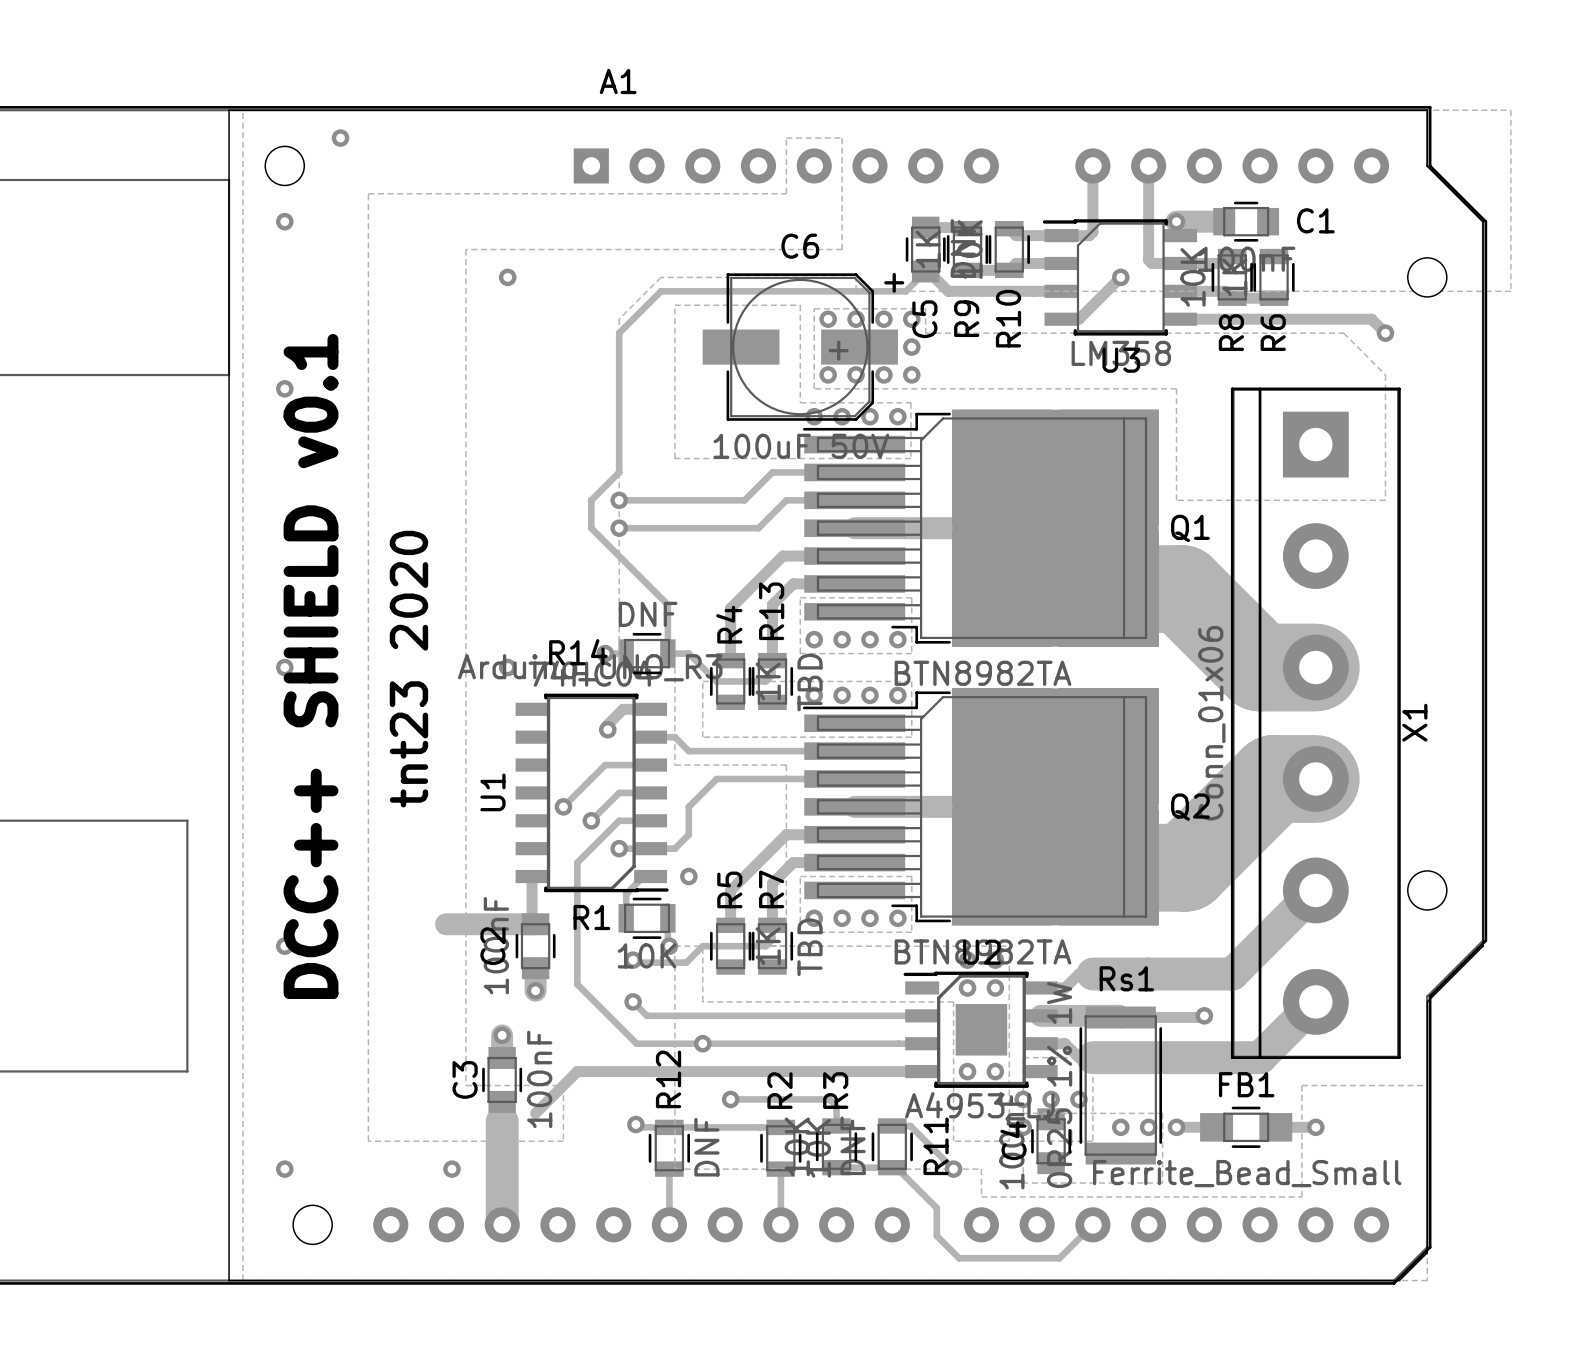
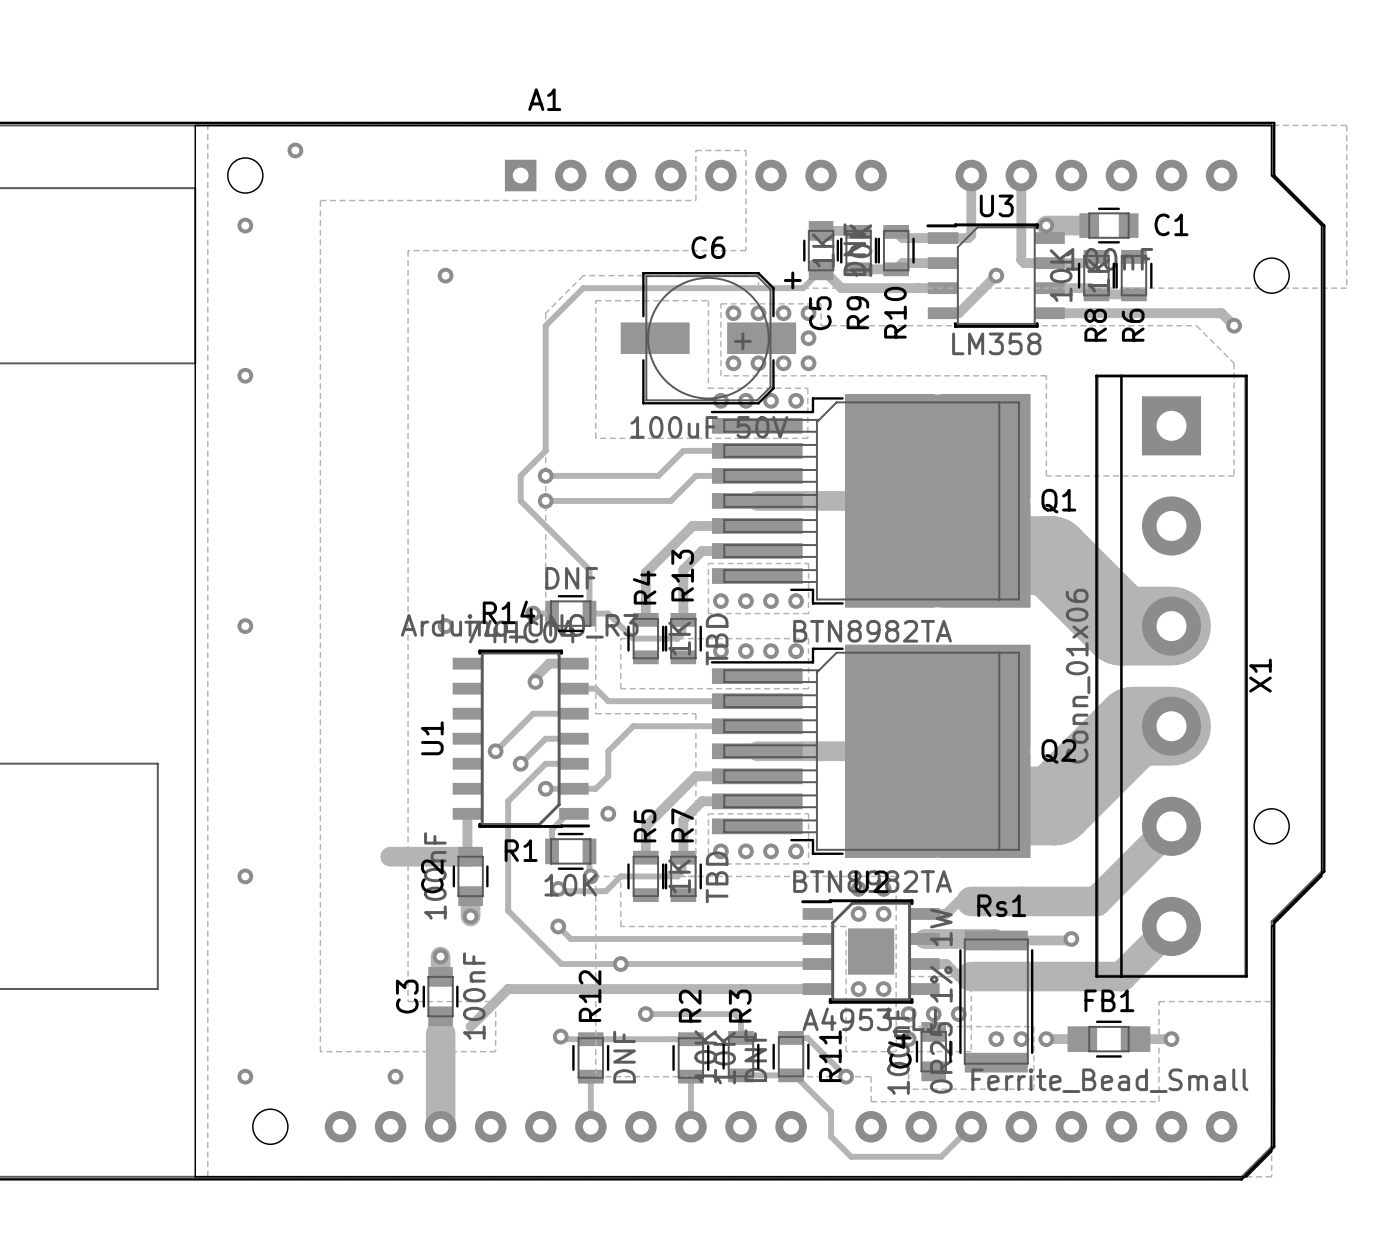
U3 name position: U3 (1121, 360) -> U3 (996, 205)
text: DCC++ SHIELD v0.1 (311, 666) -> none
text: tnt23 2020 (408, 669) -> none

